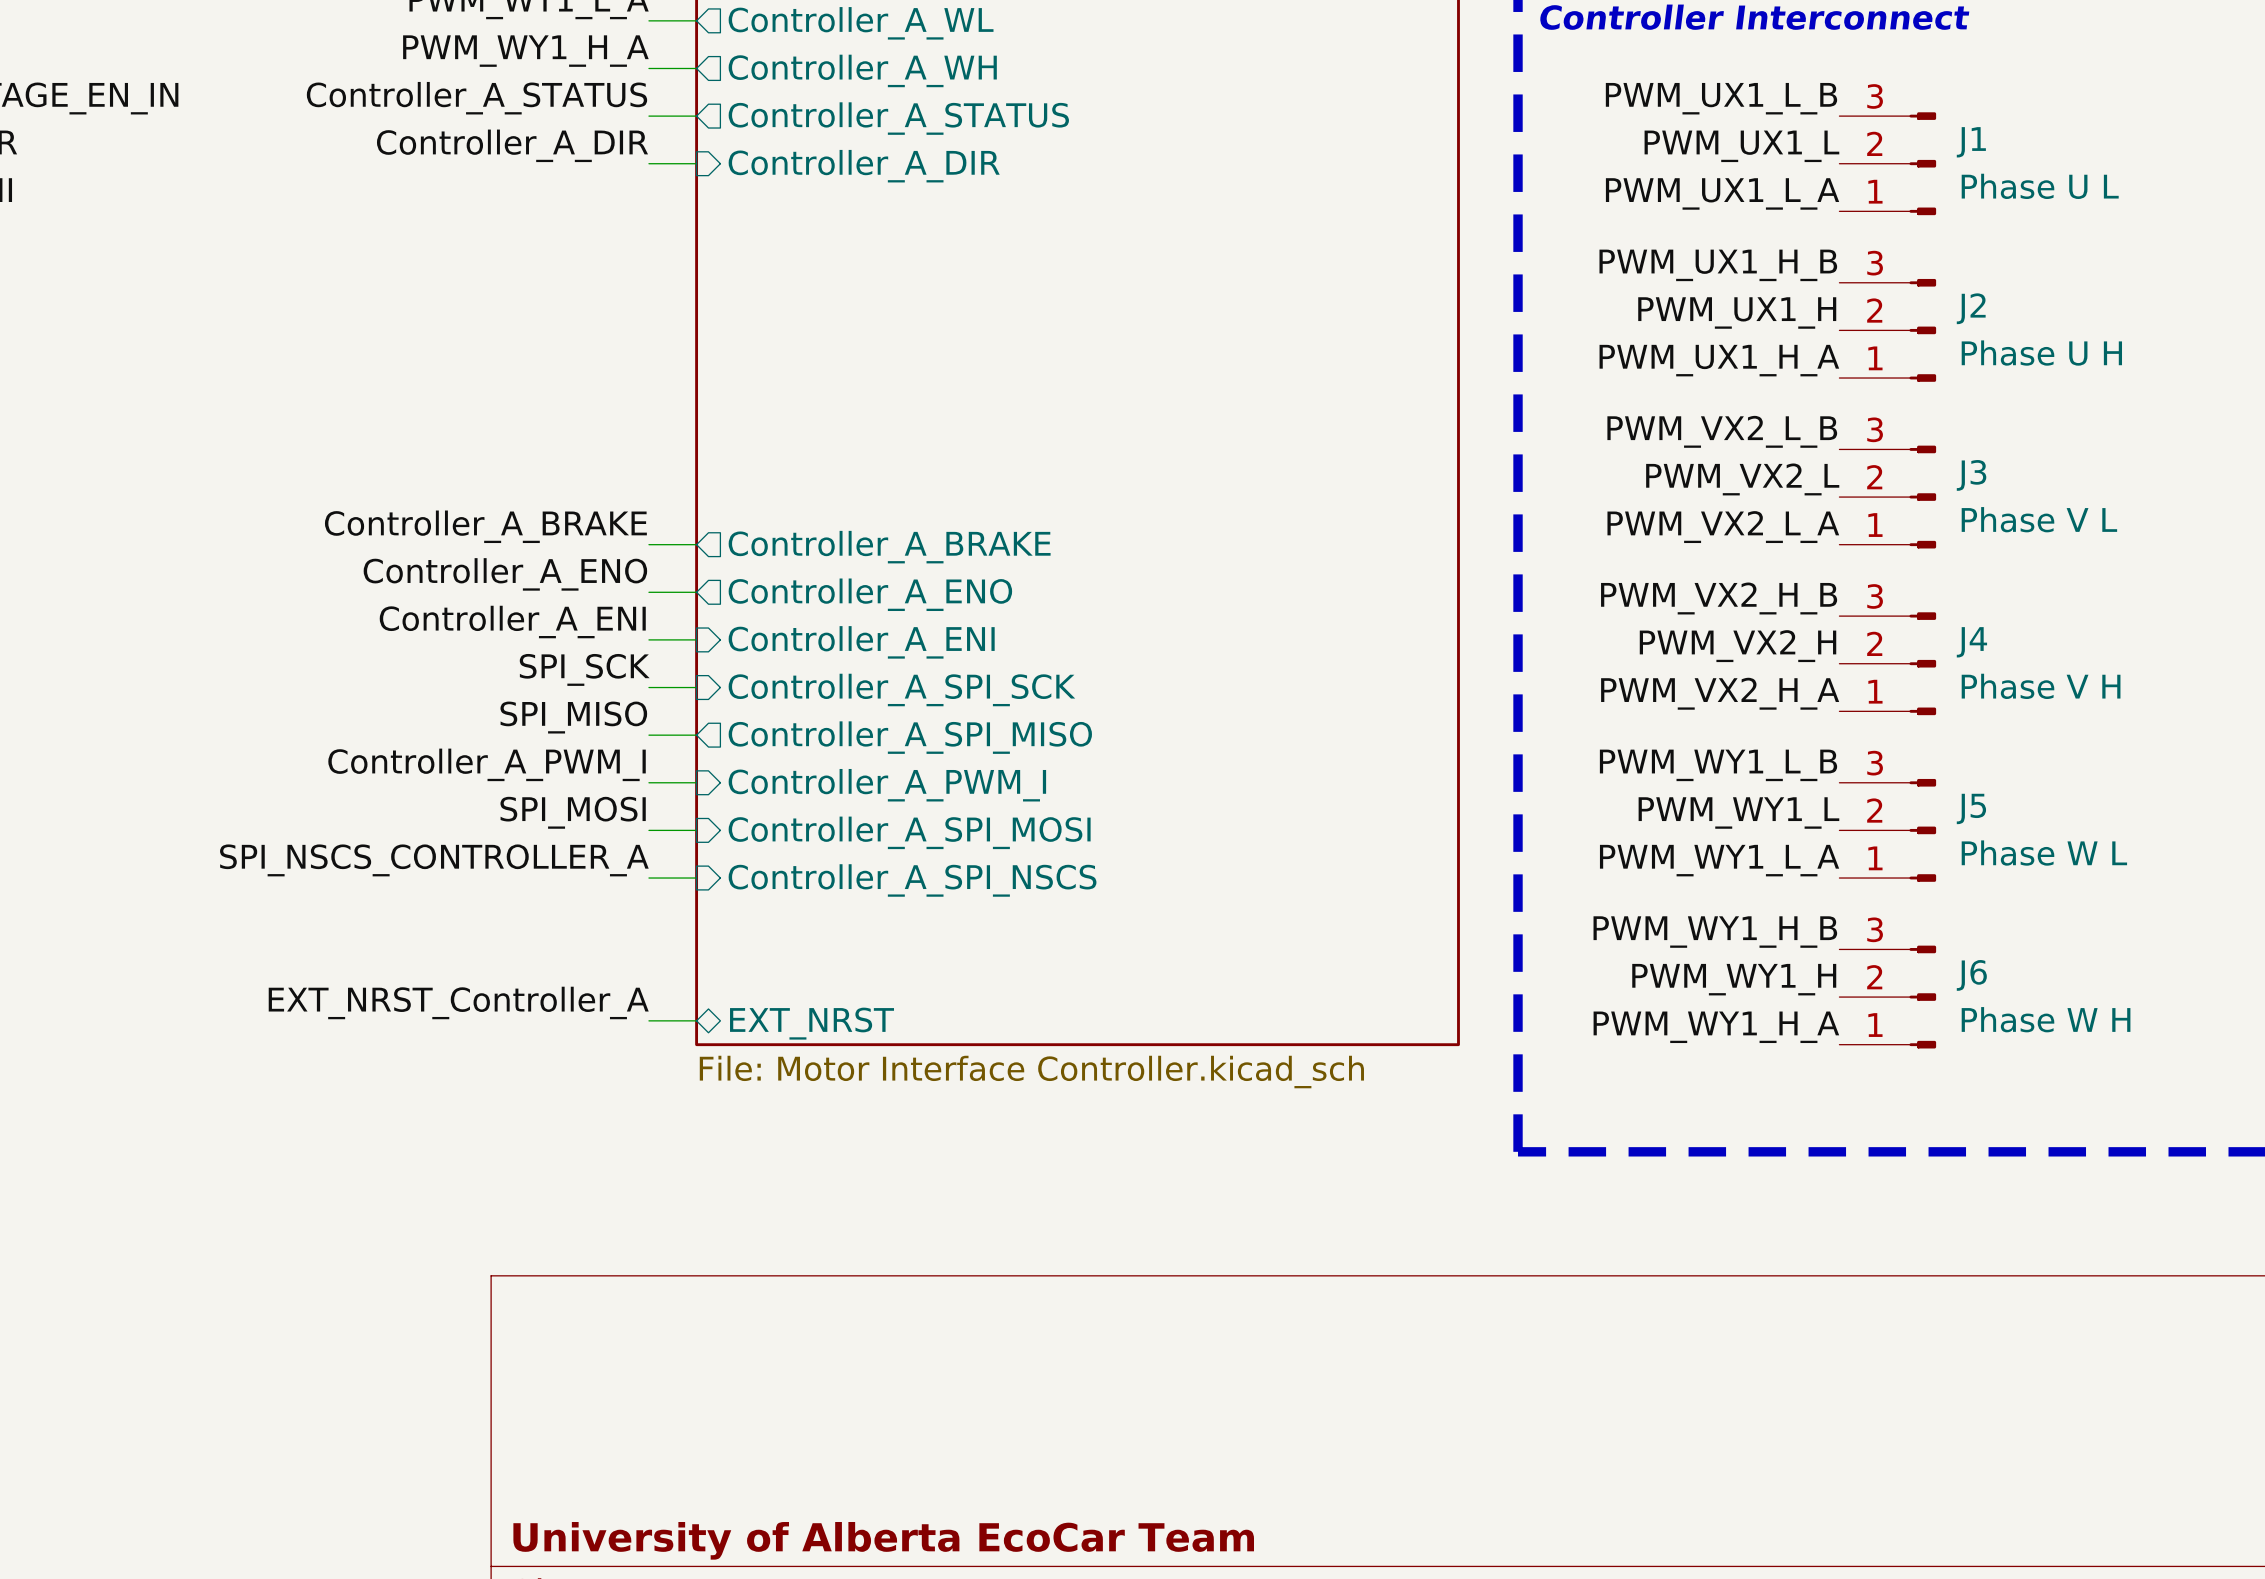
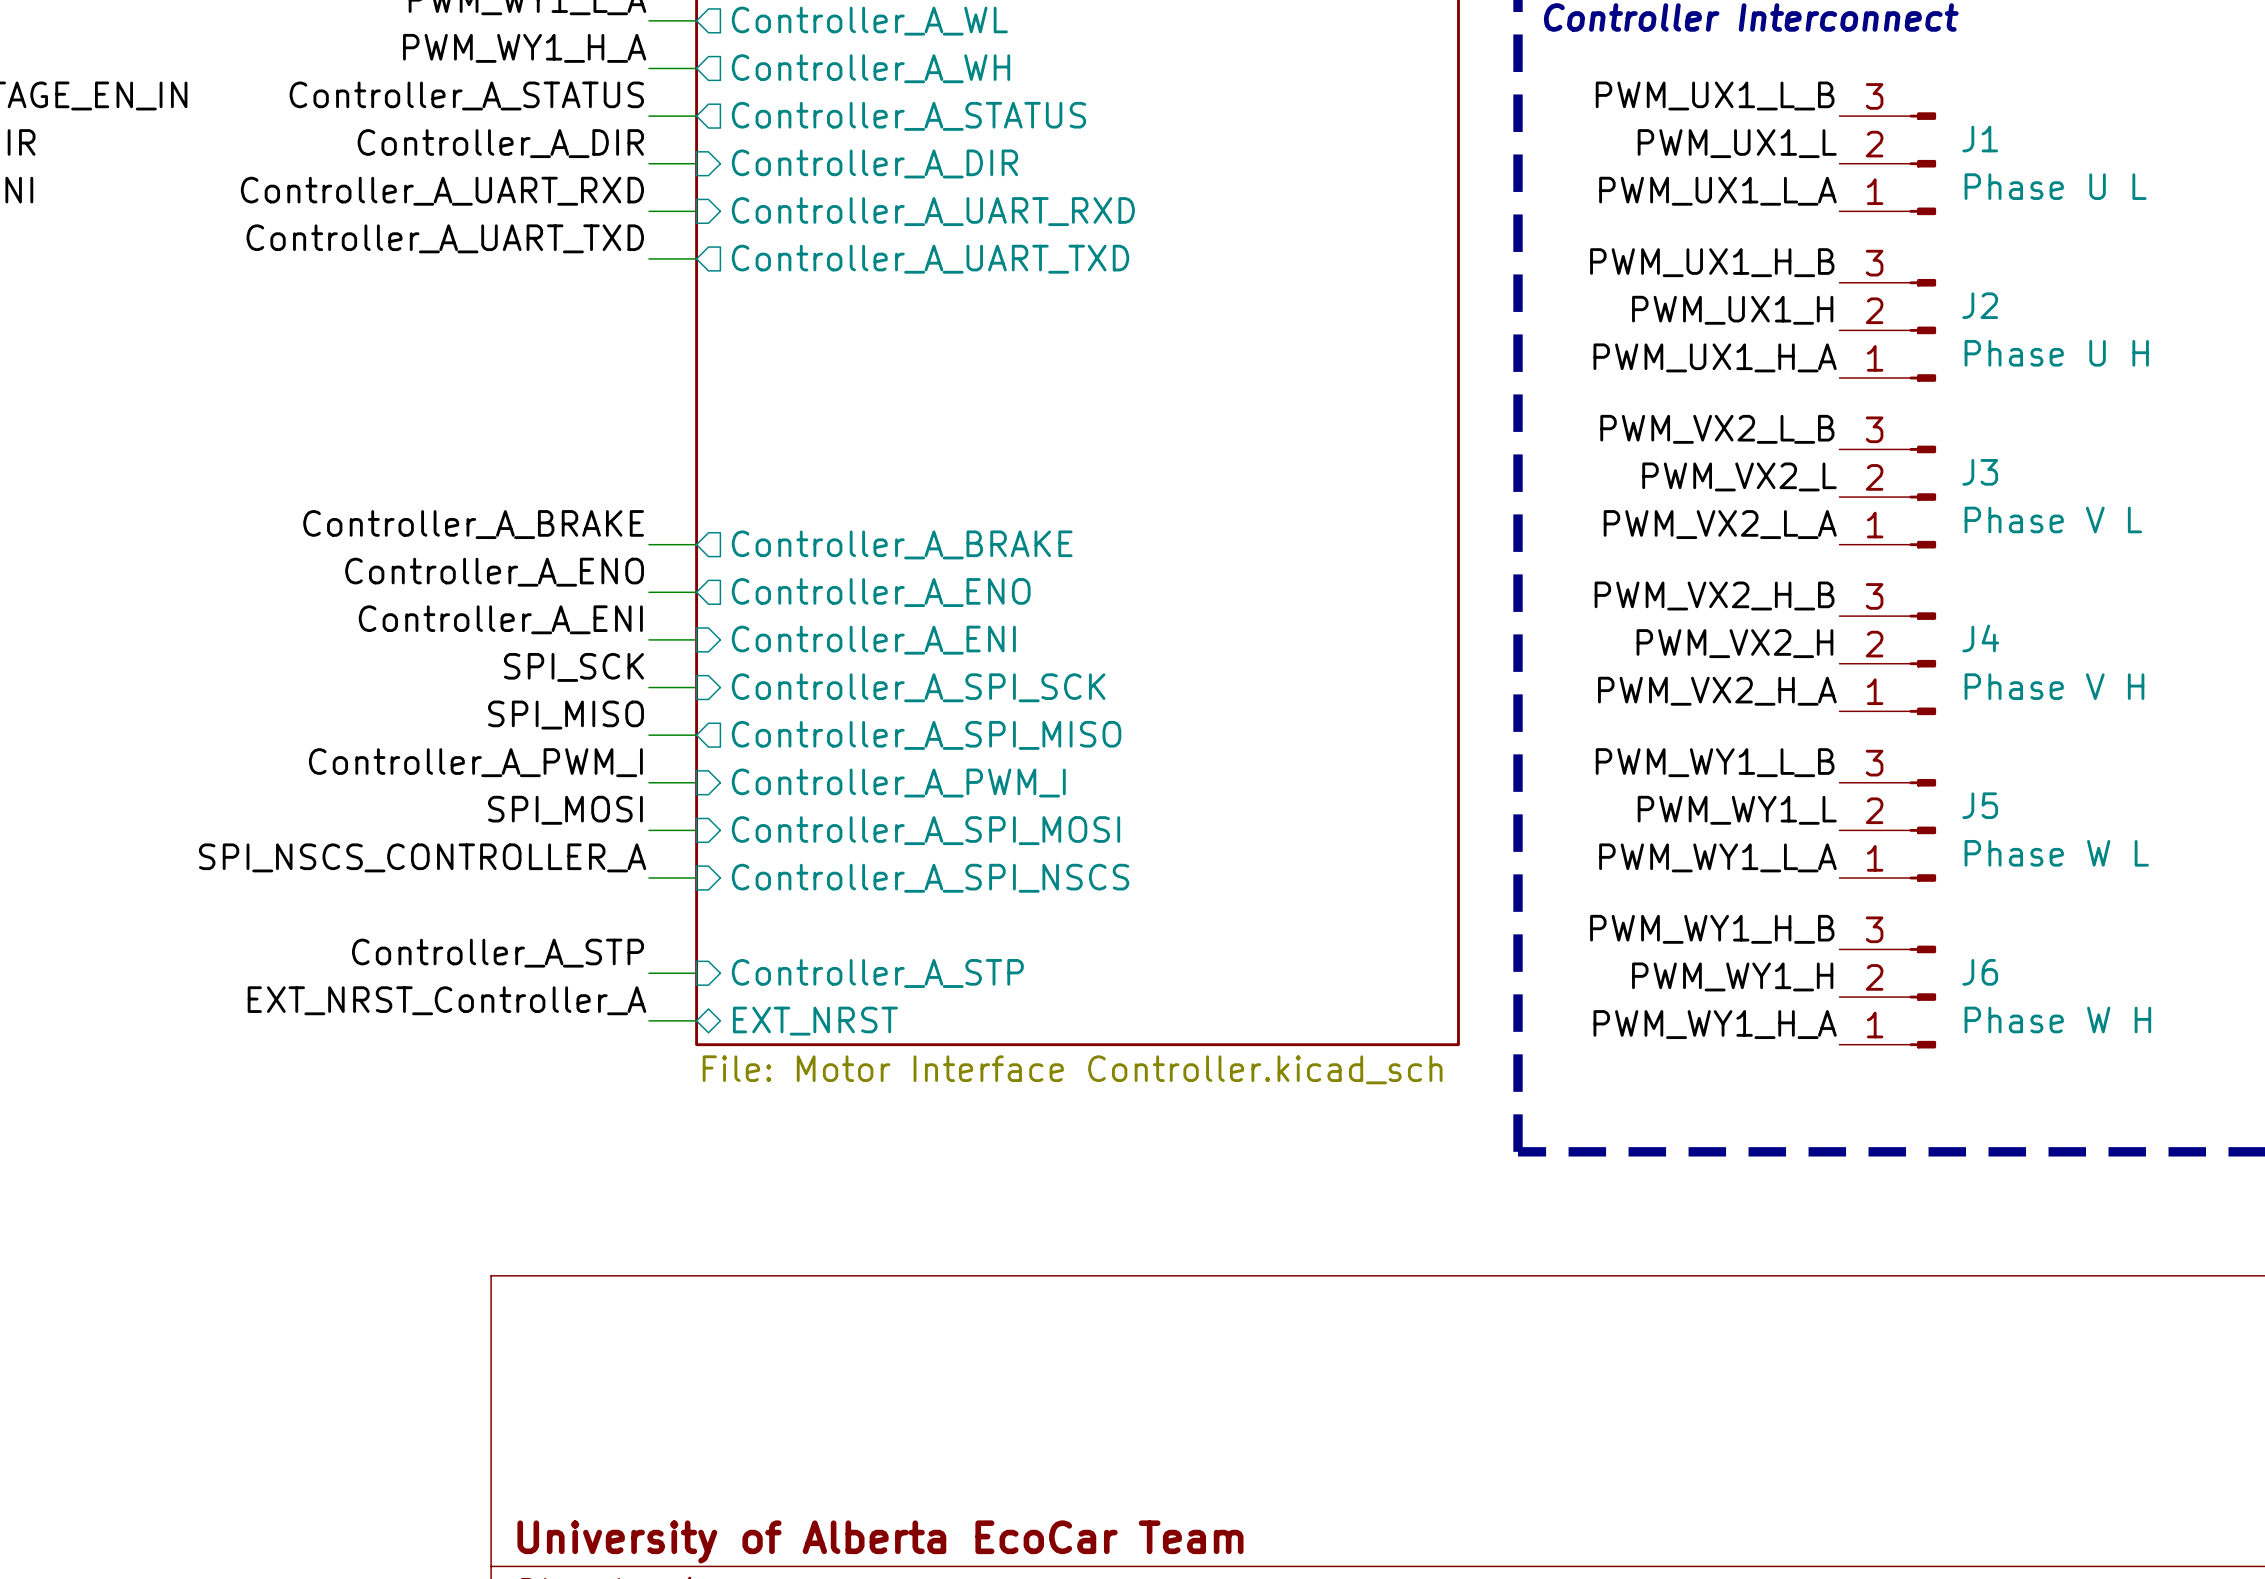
label: none -> Controller_A_UART_RXD (442, 191)
wire: none -> (648, 211) (696, 211)
sheet pin: none -> Controller_A_UART_RXD (933, 211)
label: none -> Controller_A_UART_TXD (445, 238)
wire: none -> (648, 258) (696, 258)
sheet pin: none -> Controller_A_UART_TXD (930, 259)
label: none -> Controller_A_STP (497, 953)
wire: none -> (648, 973) (696, 973)
sheet pin: none -> Controller_A_STP (877, 973)

